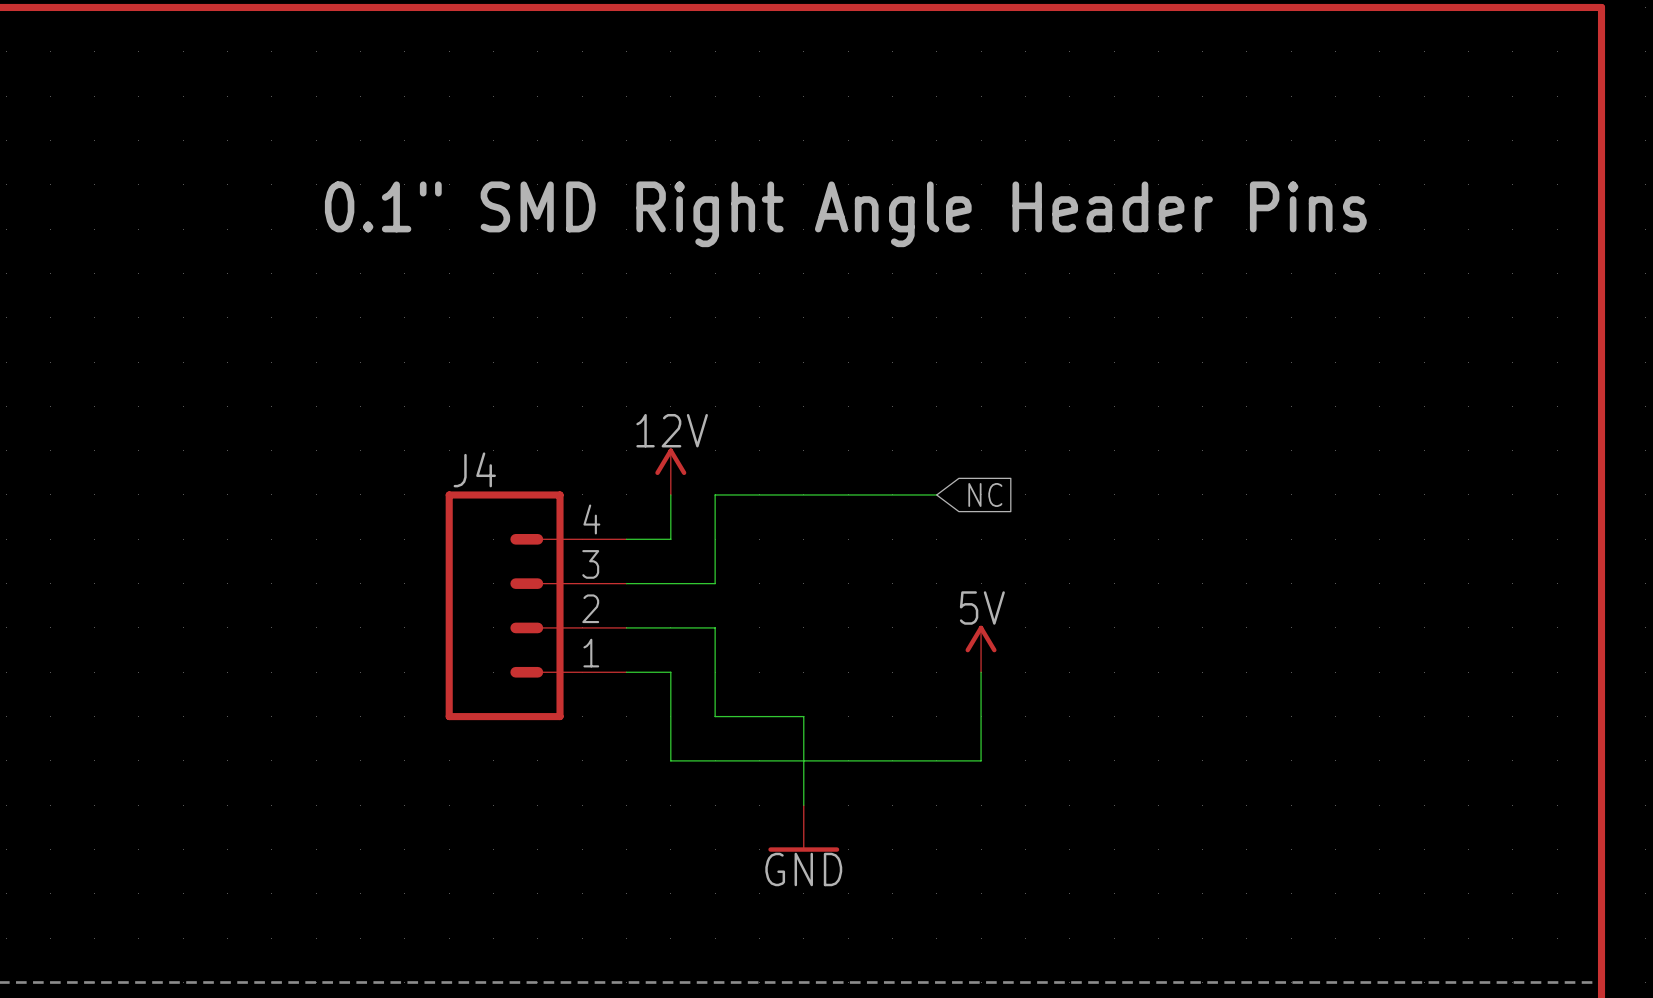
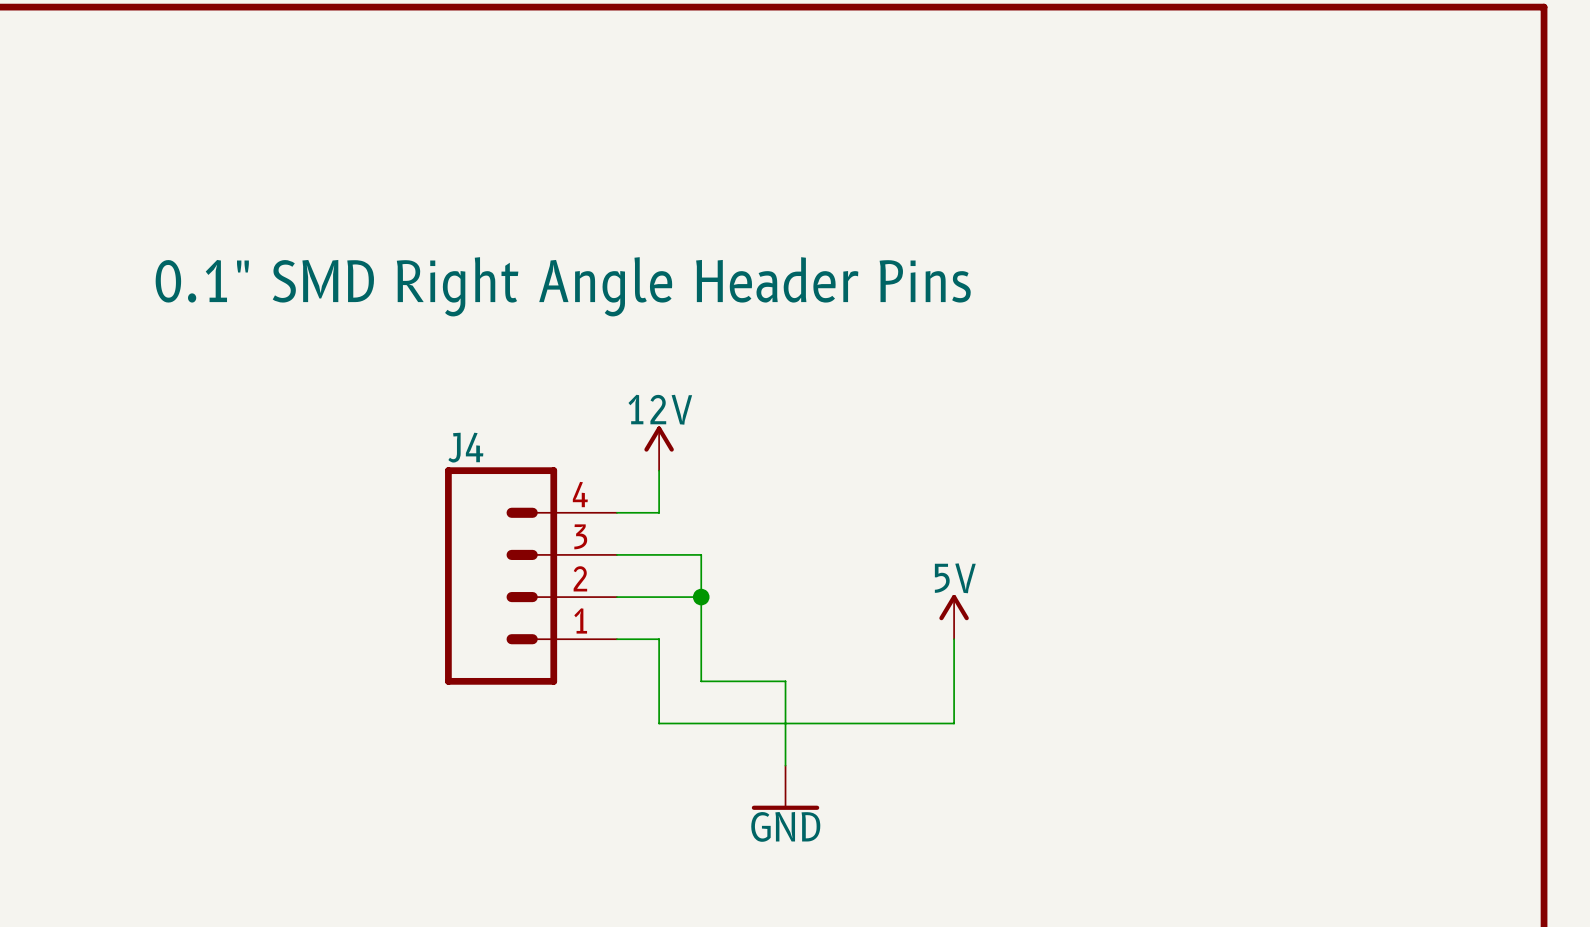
text position: 0.1" SMD Right Angle Header Pins (845, 214) -> 0.1" SMD Right Angle Header Pins (563, 286)
wire: (936, 494) (715, 494) (715, 583) -> (701, 597) (701, 554)
global label: NC (985, 494) -> none
junction: none -> (701, 597)

